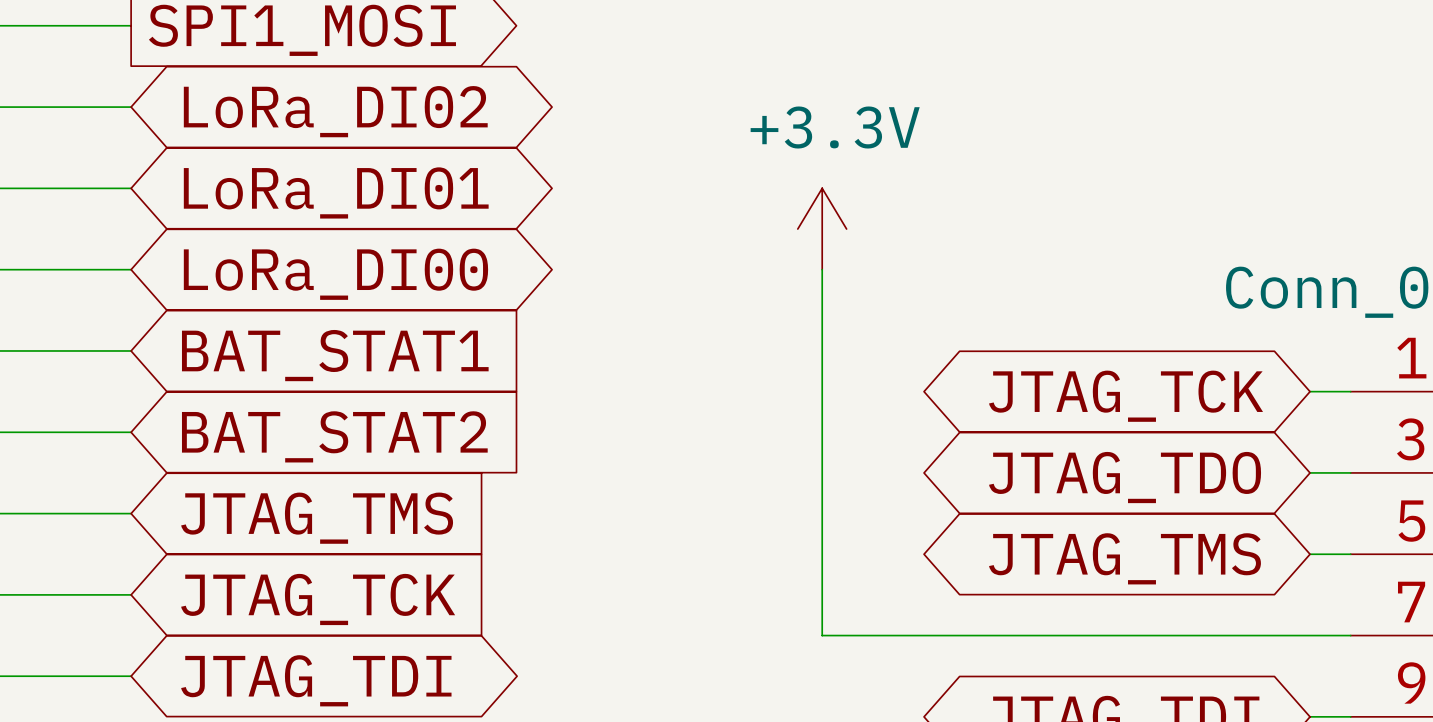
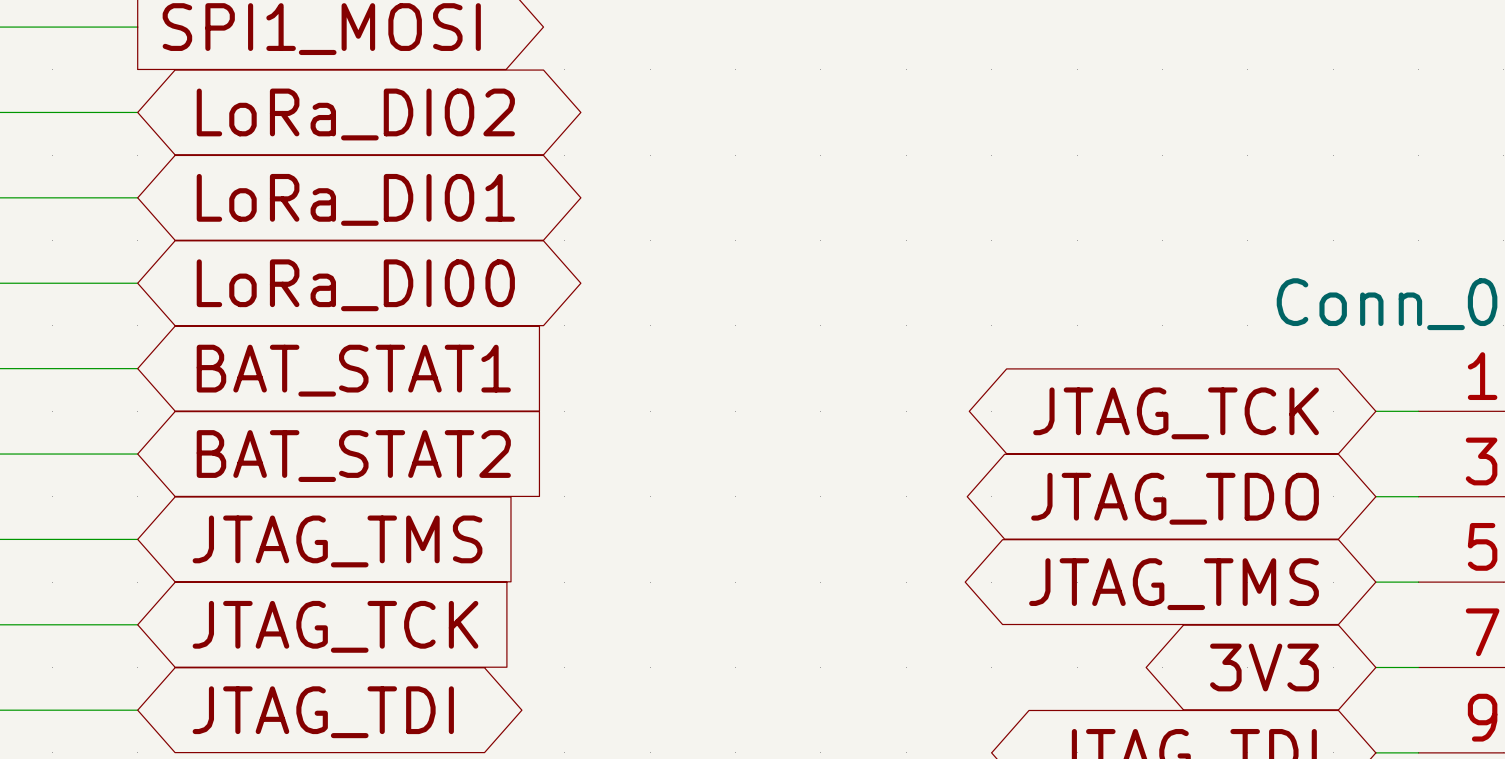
power symbol: +3.3V (822, 229) -> none
wire: (822, 269) (822, 635) (1310, 635) -> none
global label: none -> 3V3 (1264, 667)

